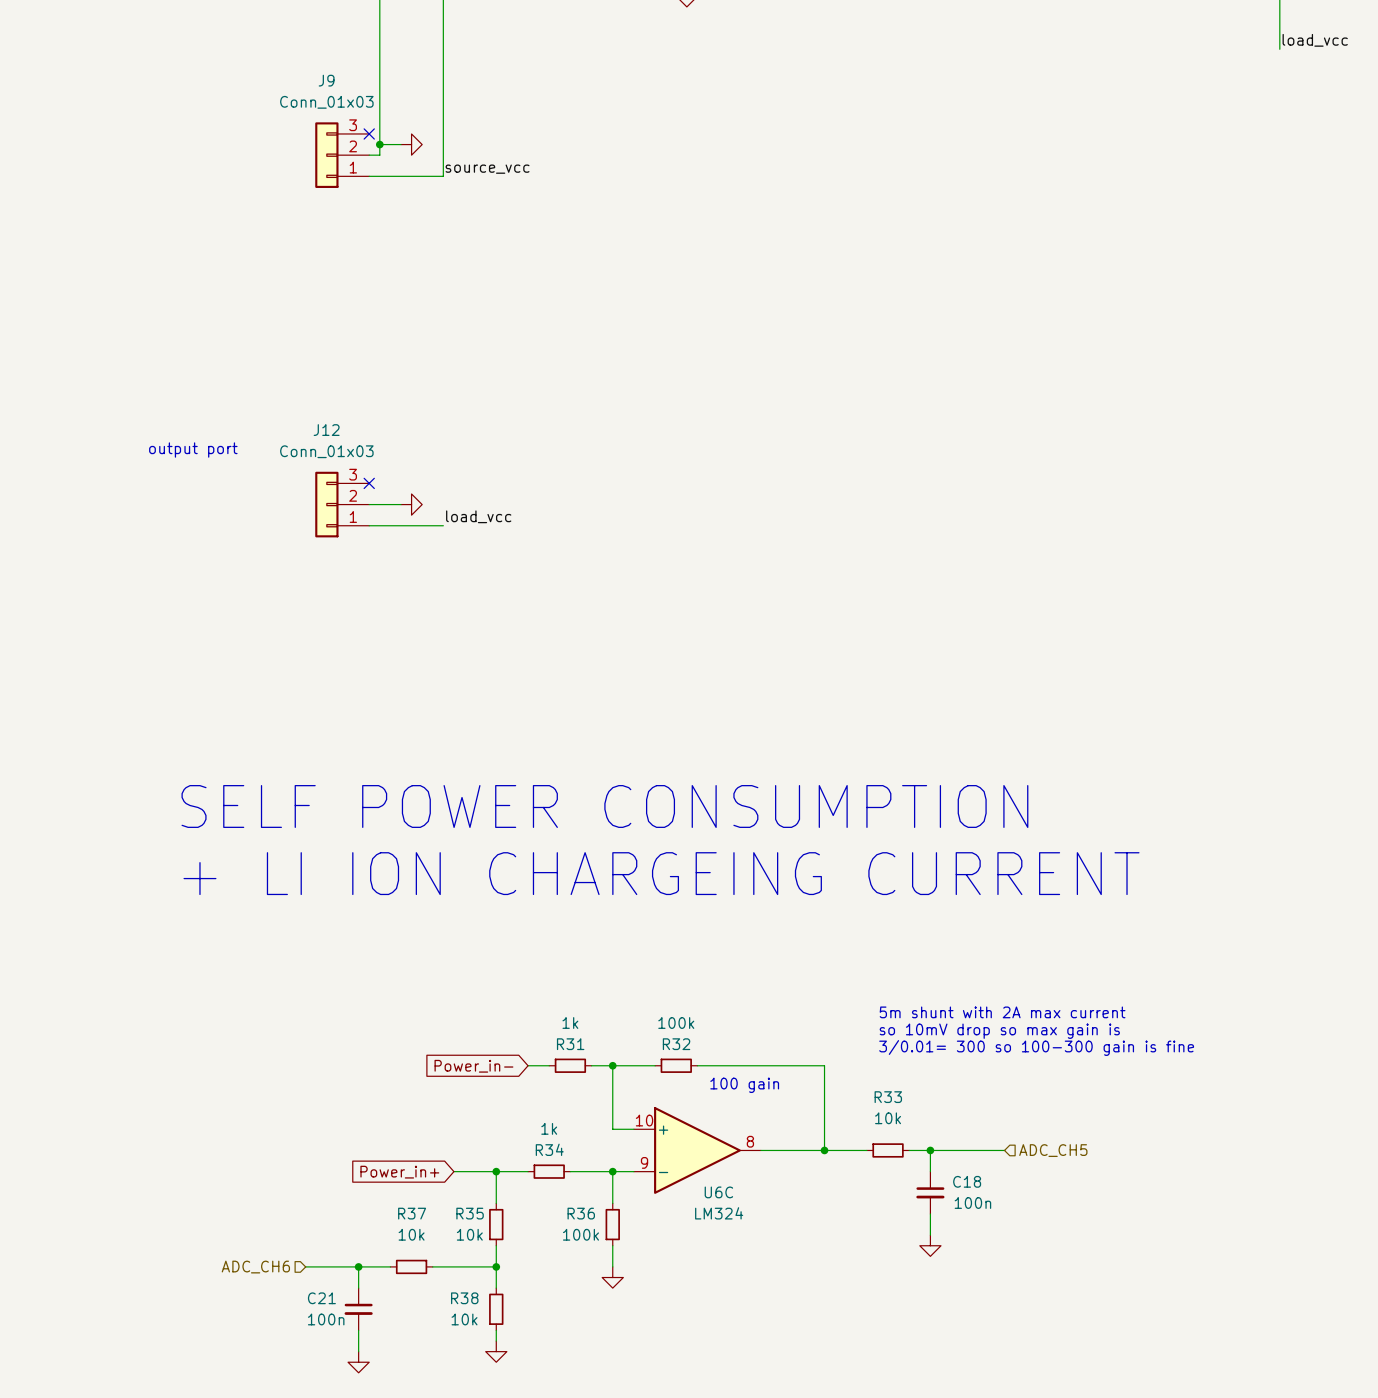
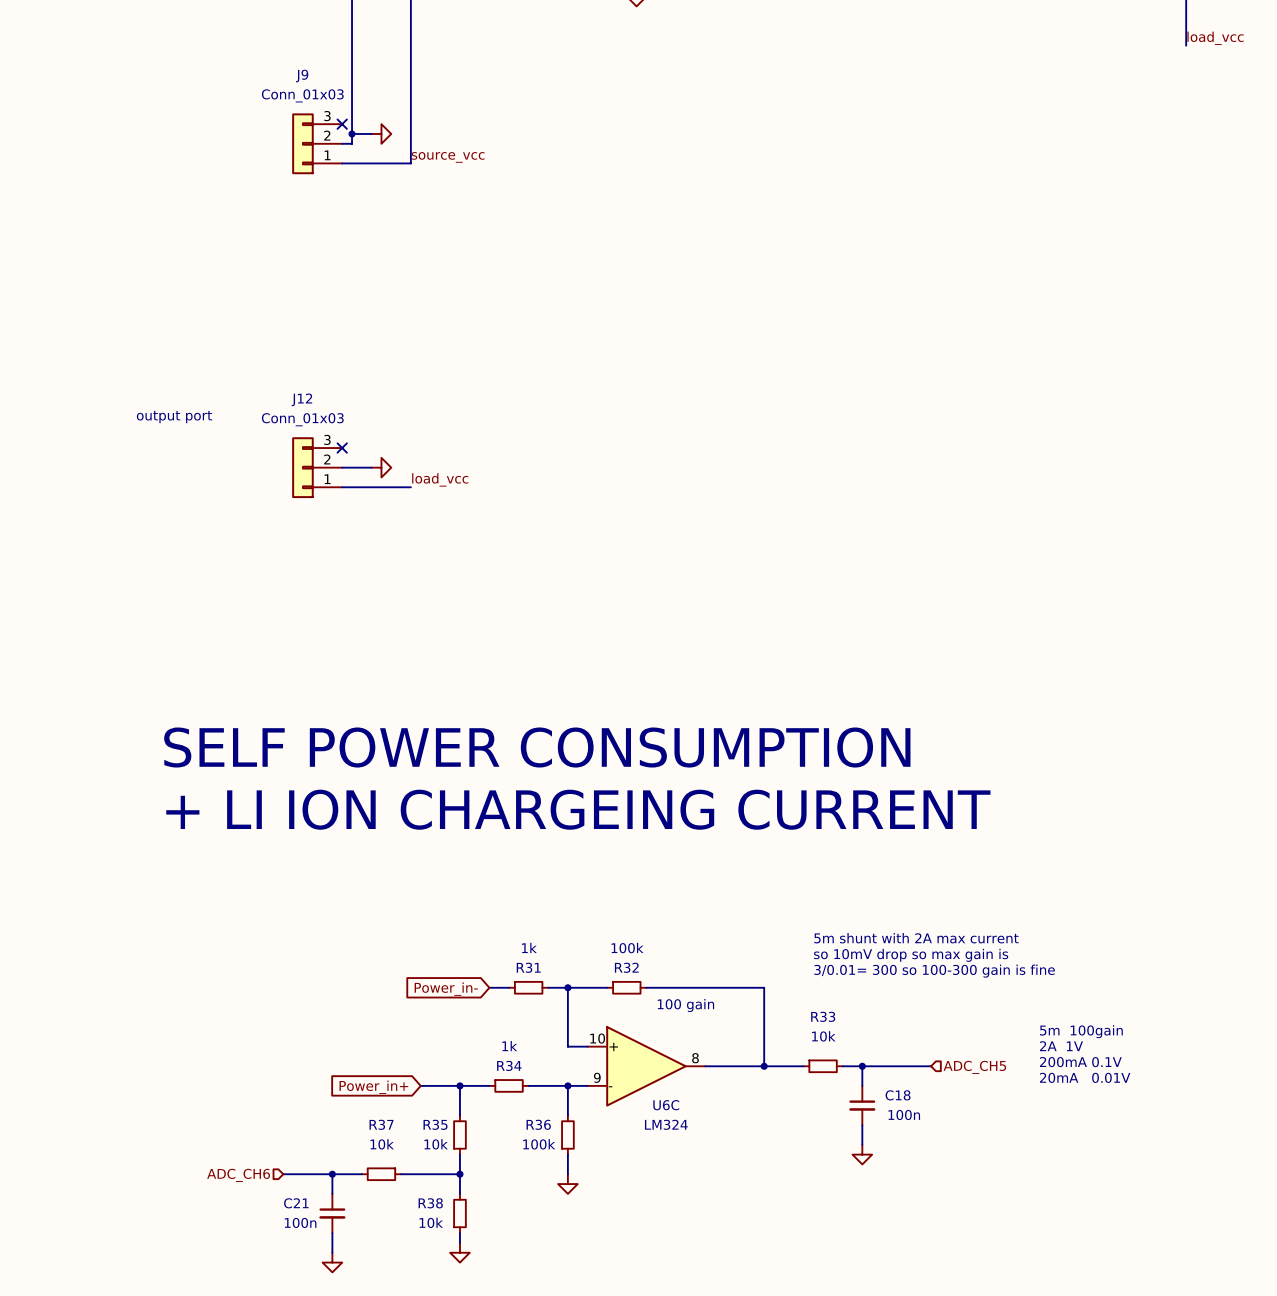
text: none -> 5m 100gain (1081, 1031)
text: none -> 2A 1V (1061, 1046)
text: none -> 200mA 0.1V (1080, 1062)
text: none -> 20mA 0.01V (1085, 1077)

